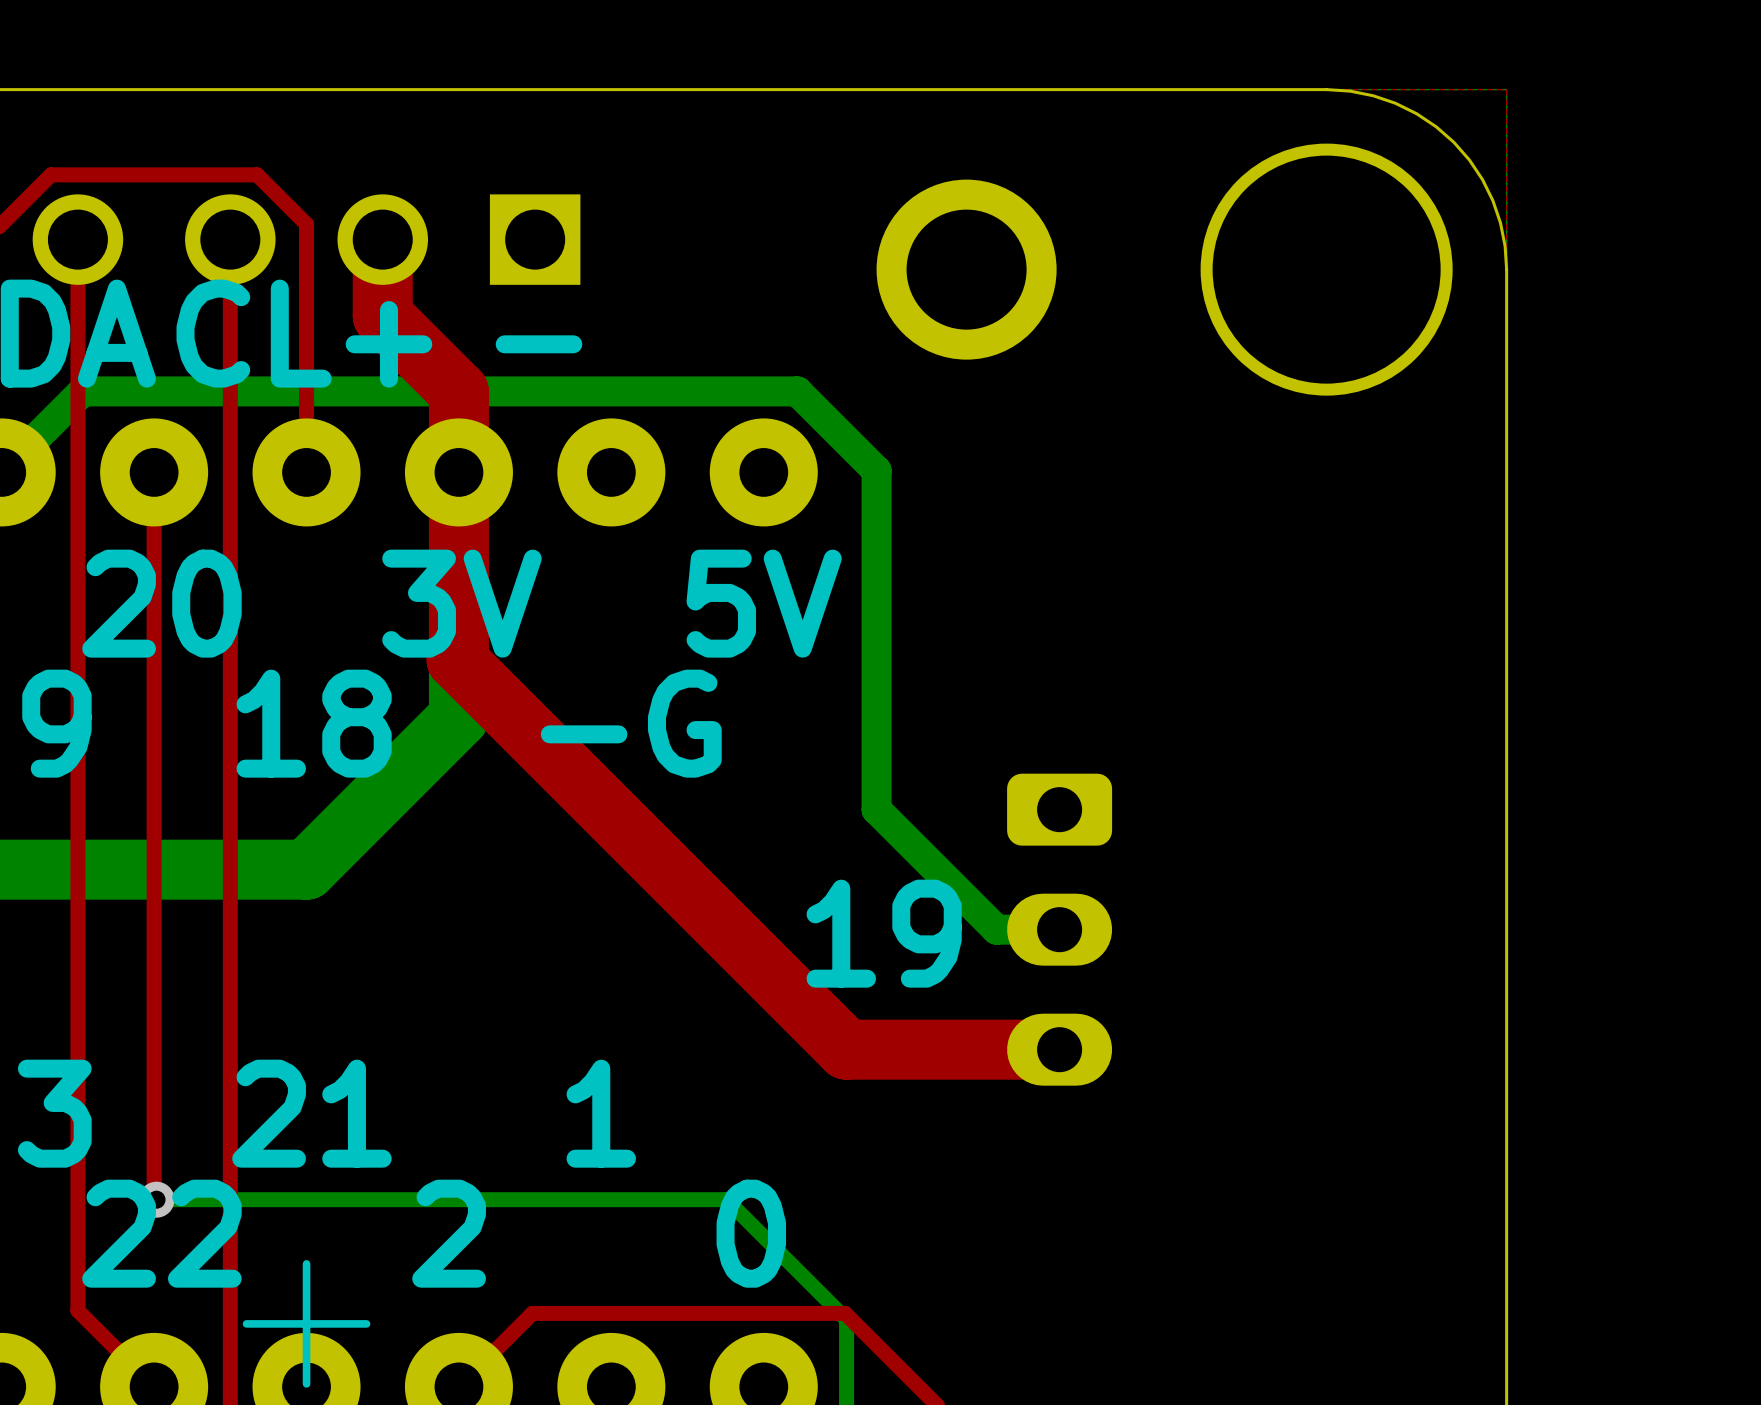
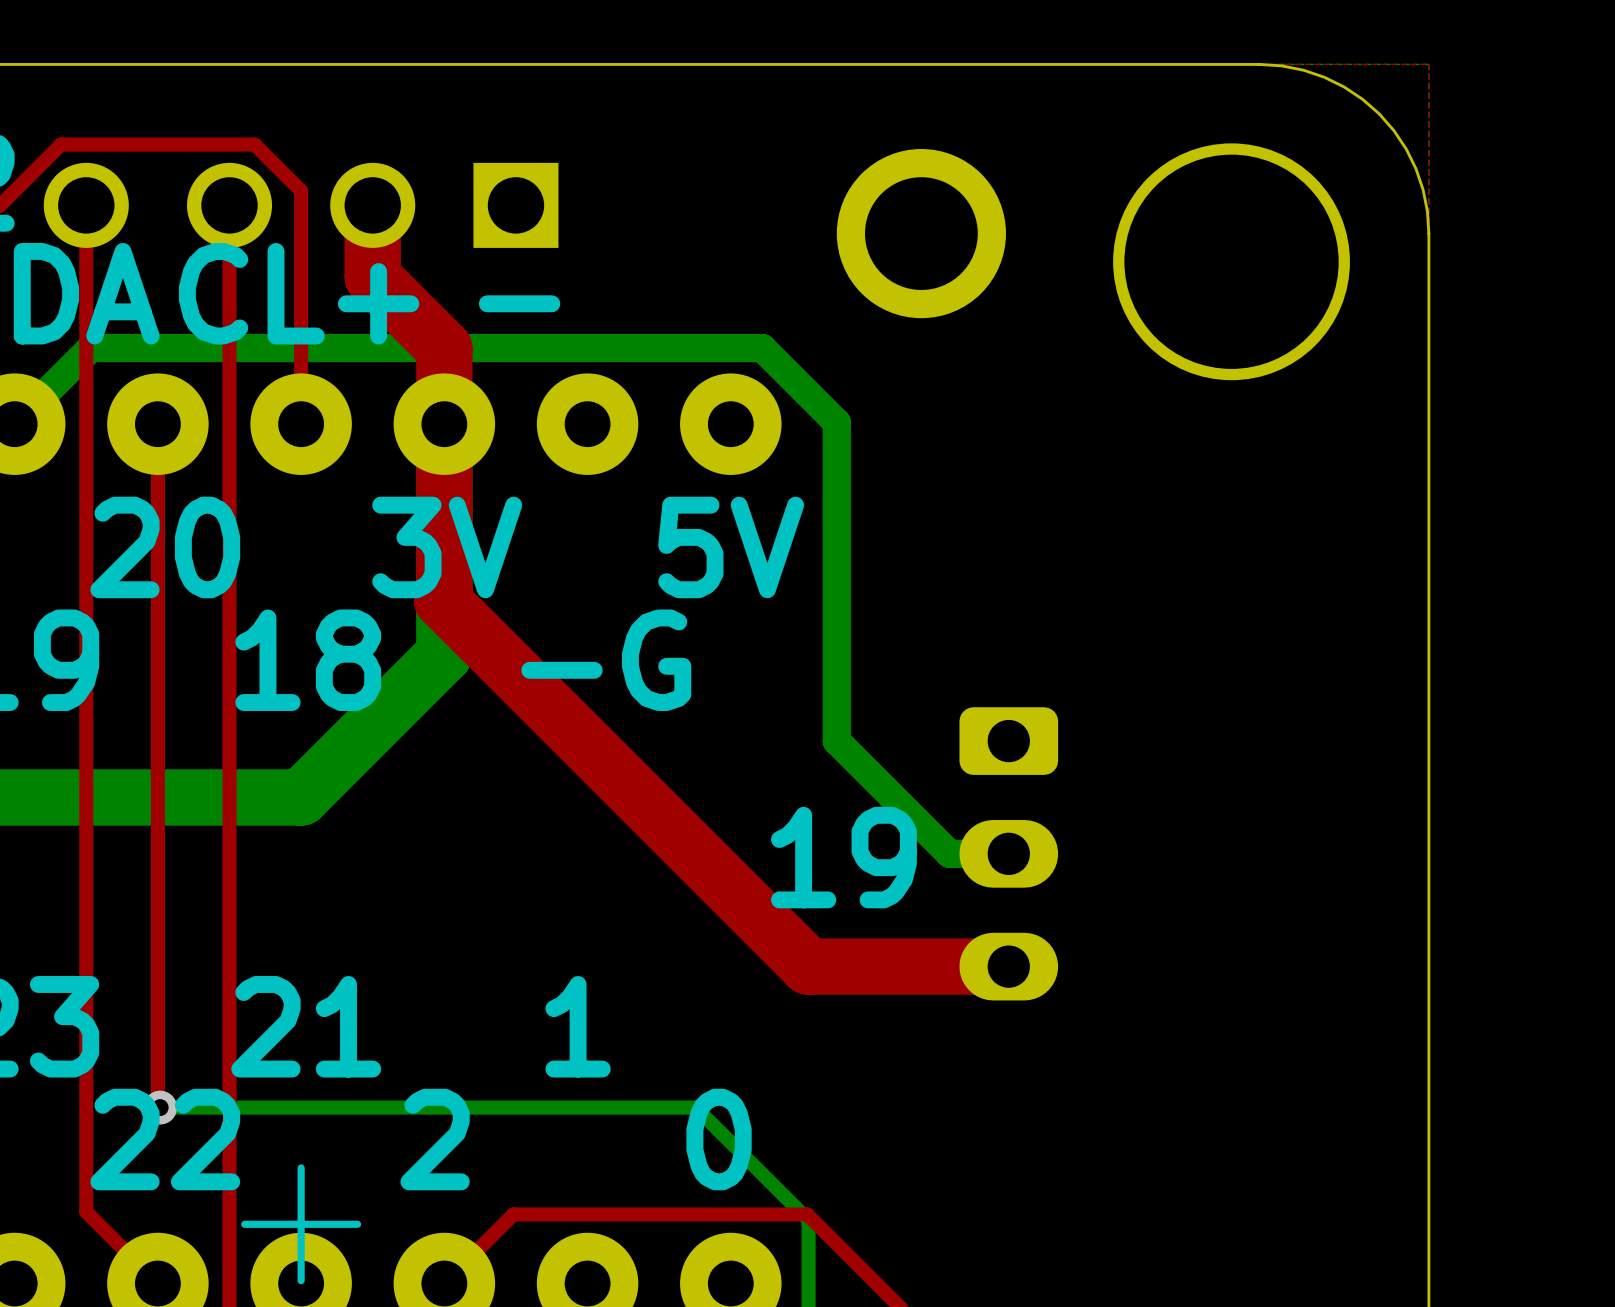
round board edge position: (1326, 269) -> (1231, 261)

